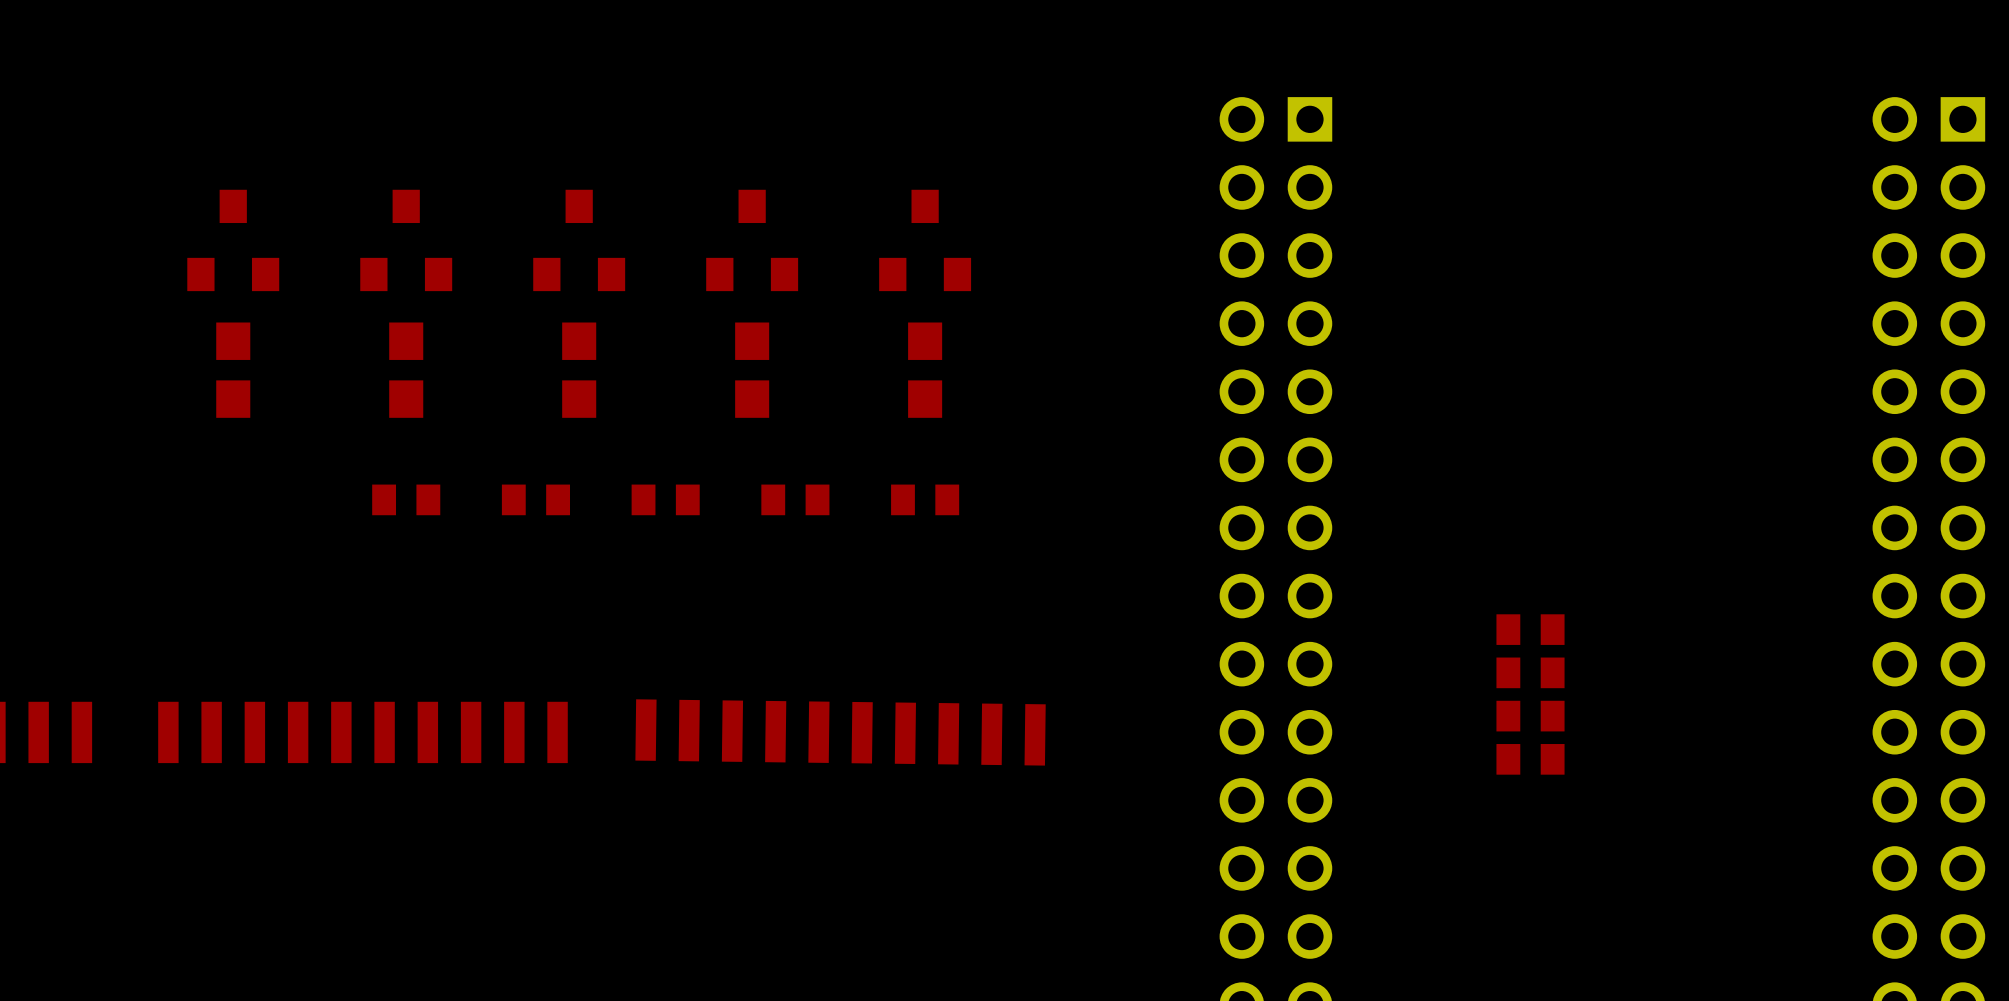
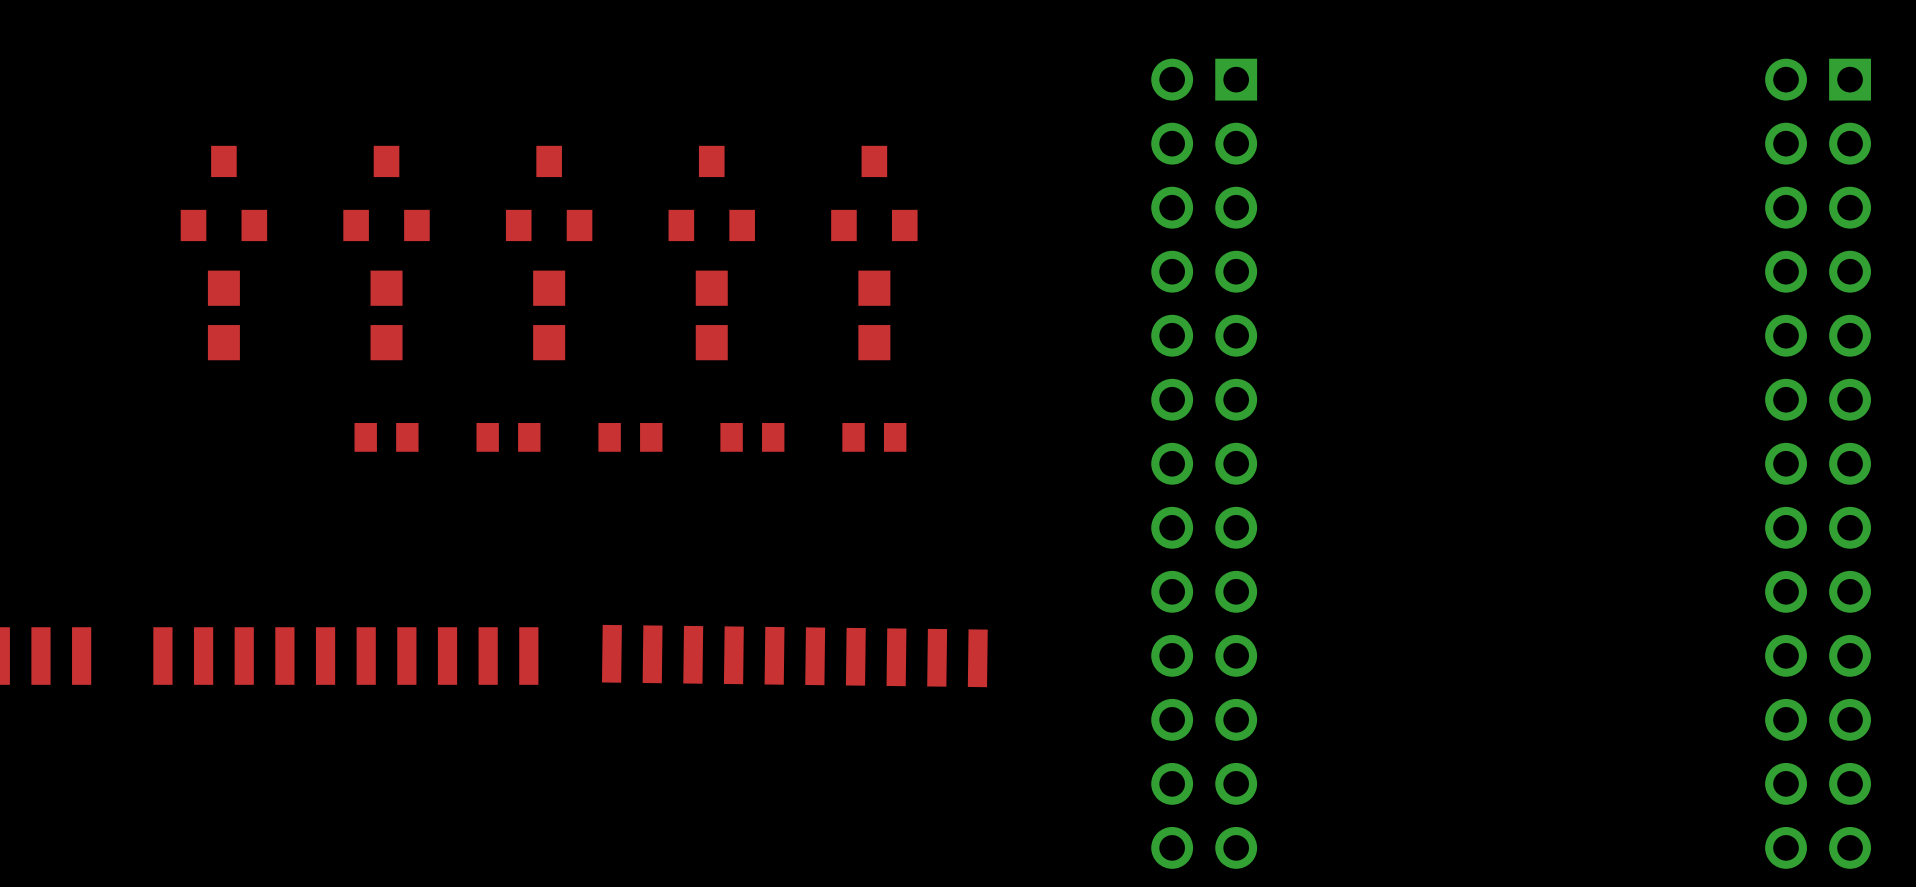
part: (1530, 629) -> none
part: (1530, 672) -> none
part: (1530, 716) -> none
part: (1530, 759) -> none

